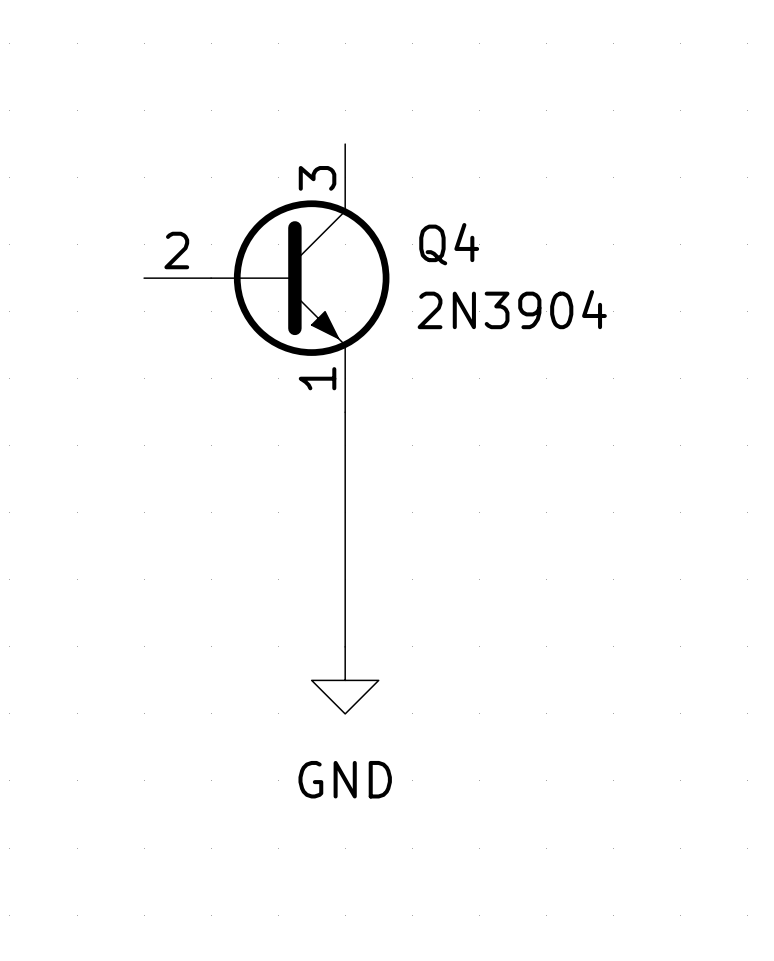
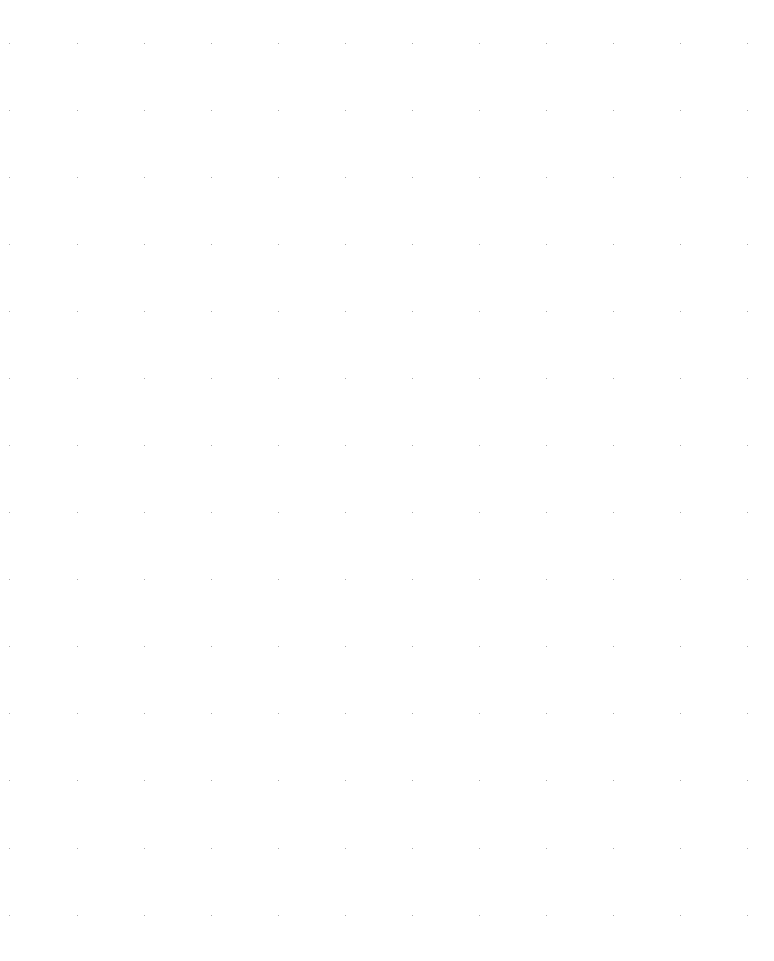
Q4: 2N3904 (266, 278) -> none
wire: (345, 412) (345, 646) -> none
power symbol: GND (345, 680) -> none

